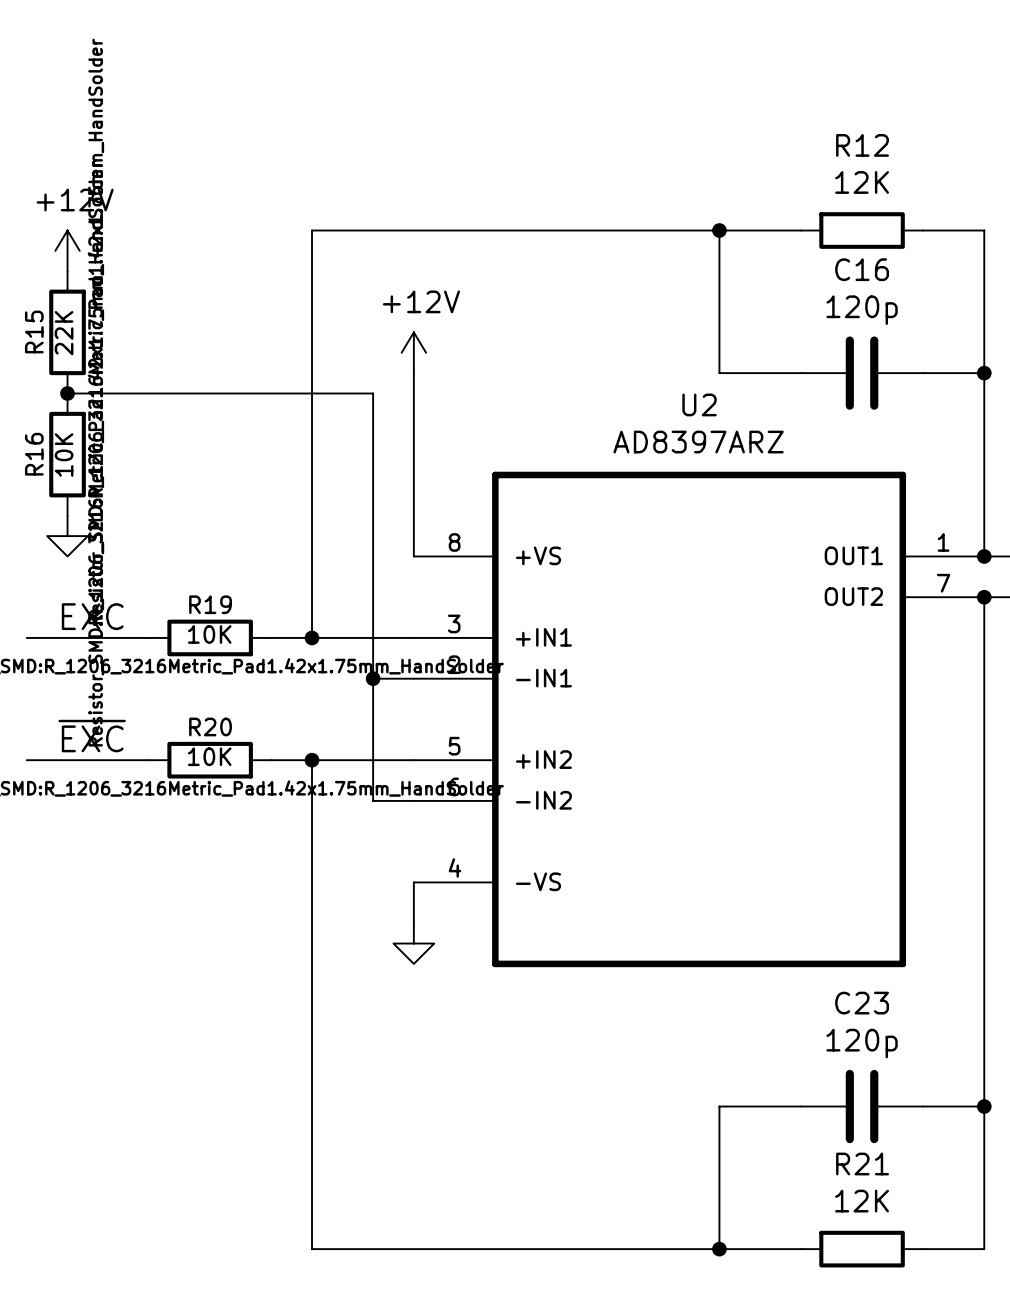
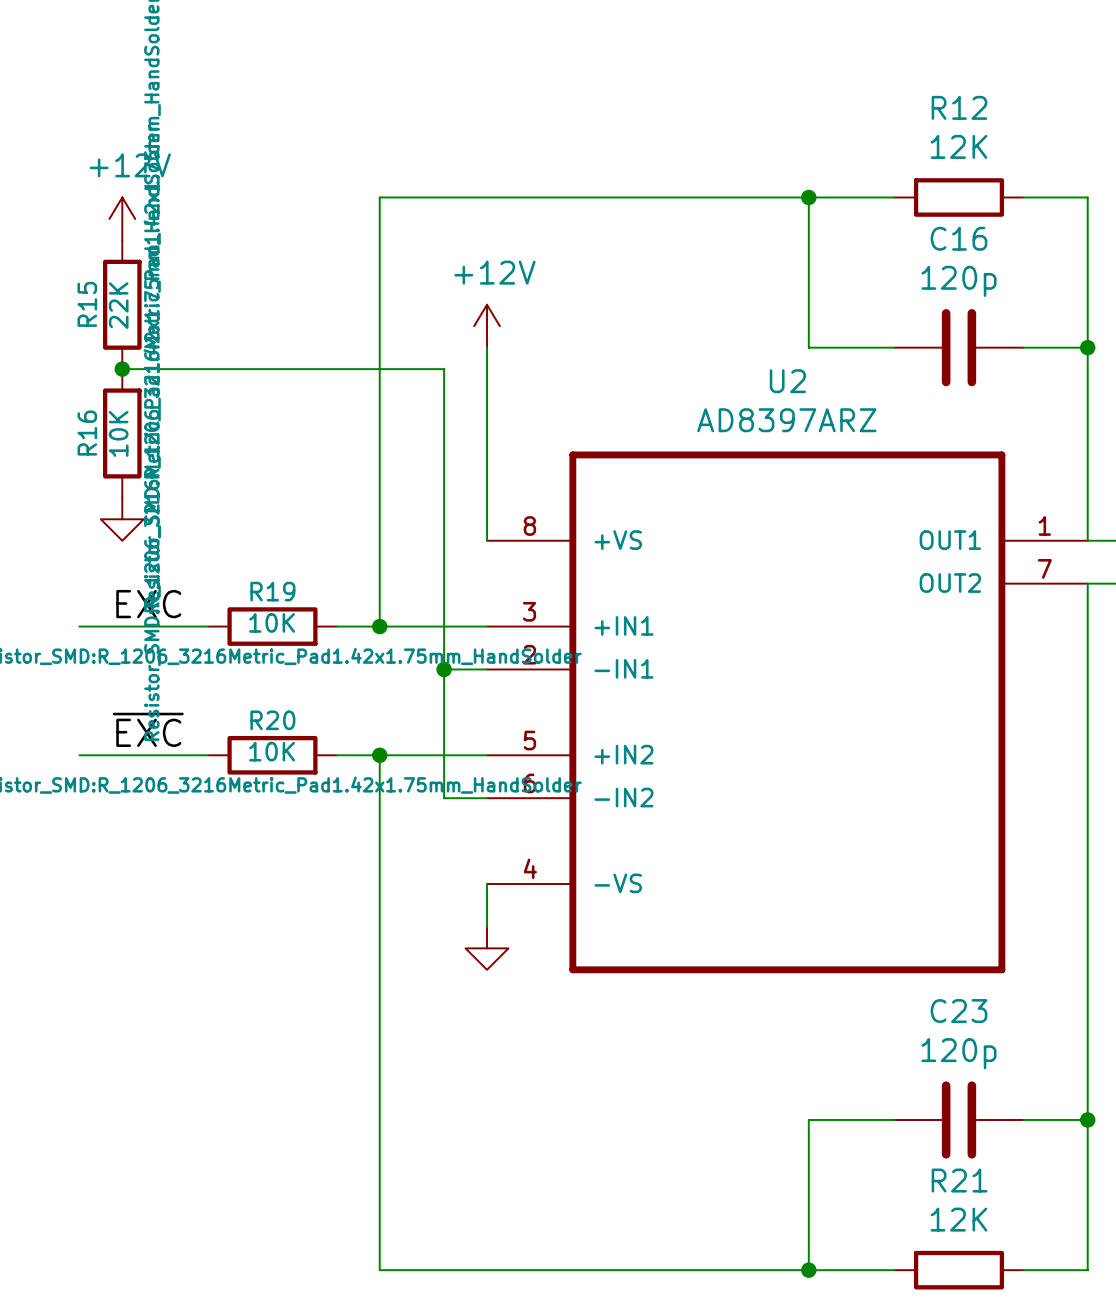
junction: (984, 556) -> none
junction: (984, 597) -> none

